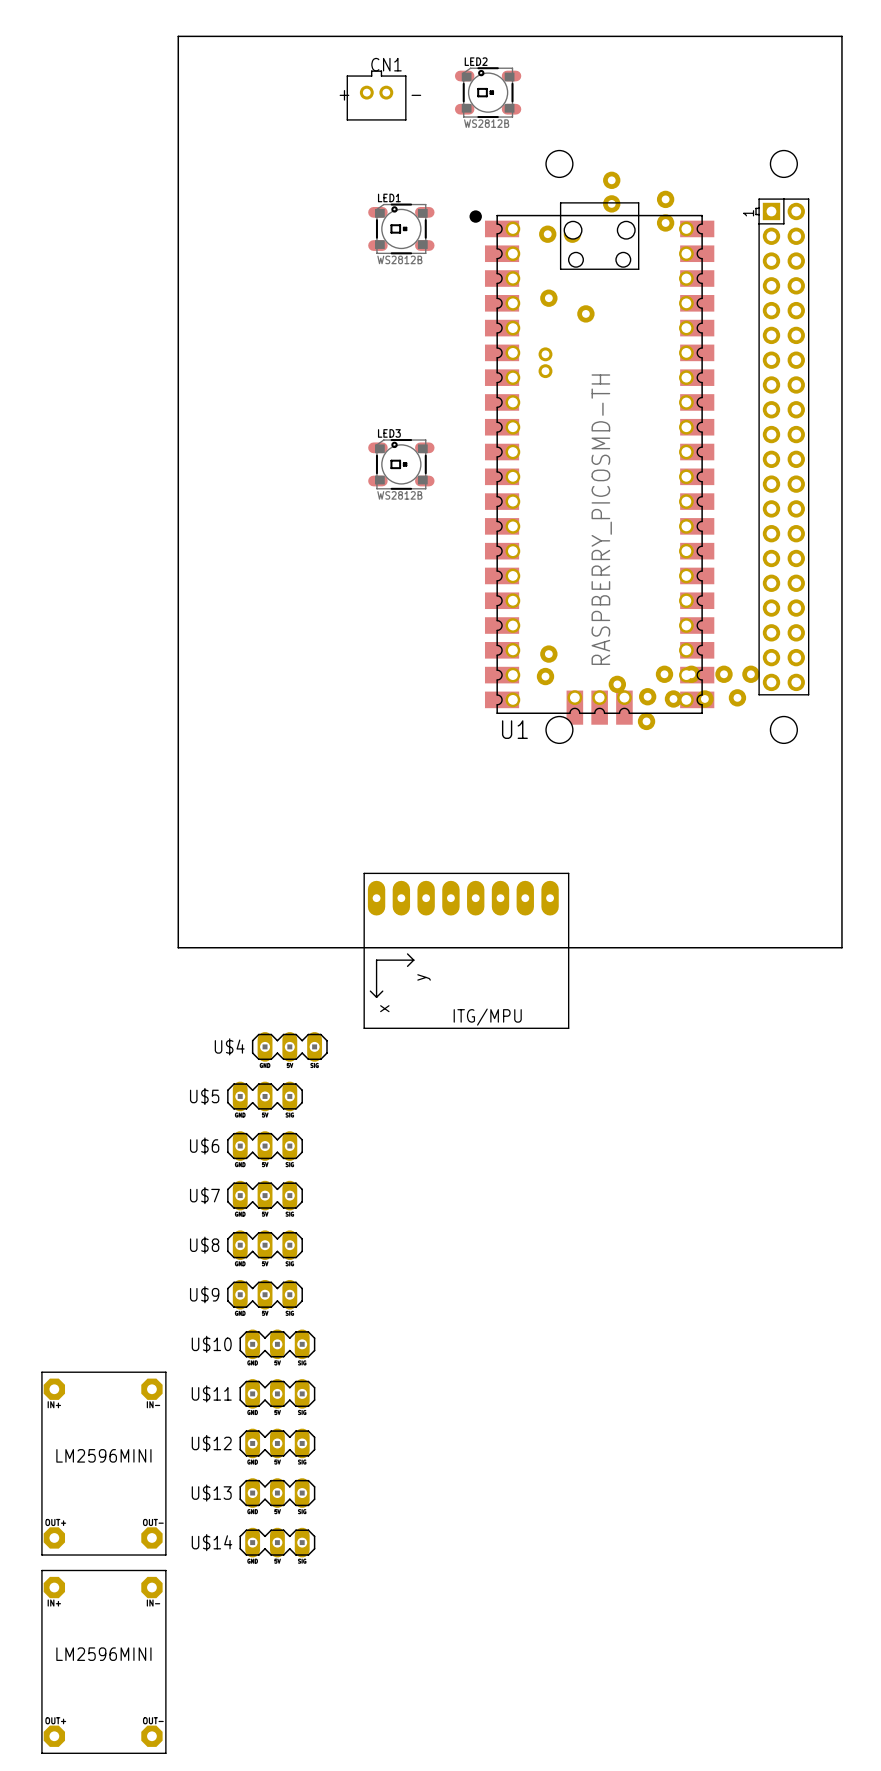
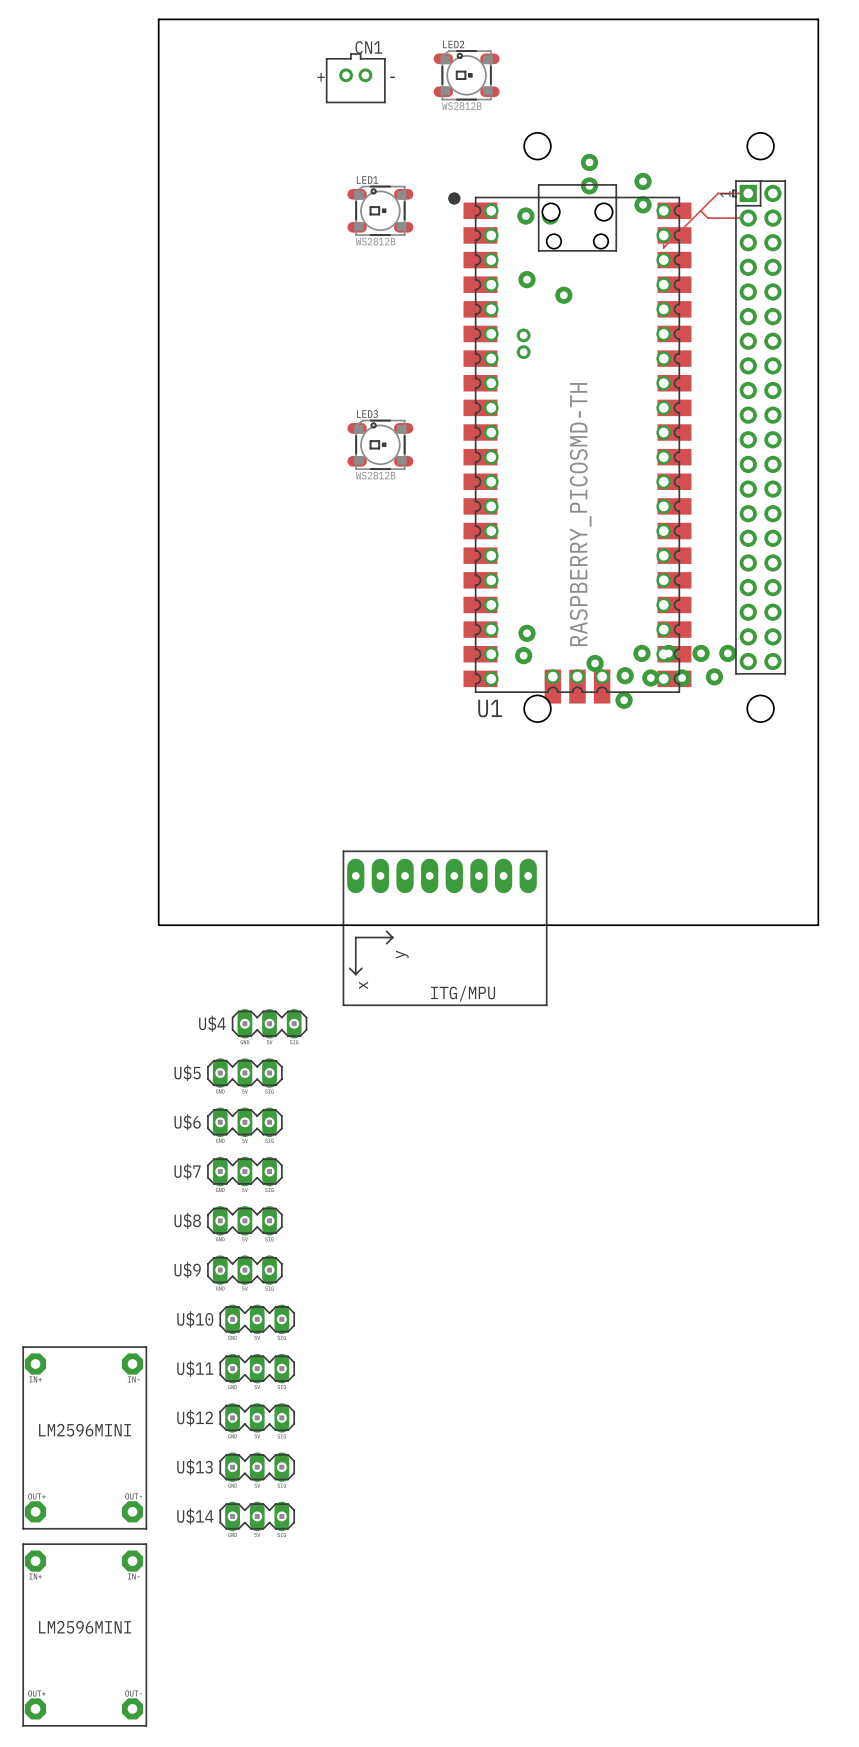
track: none -> (748, 193) (718, 193) (663, 247) (663, 235)
track: none -> (700, 210) (707, 218) (748, 218)

